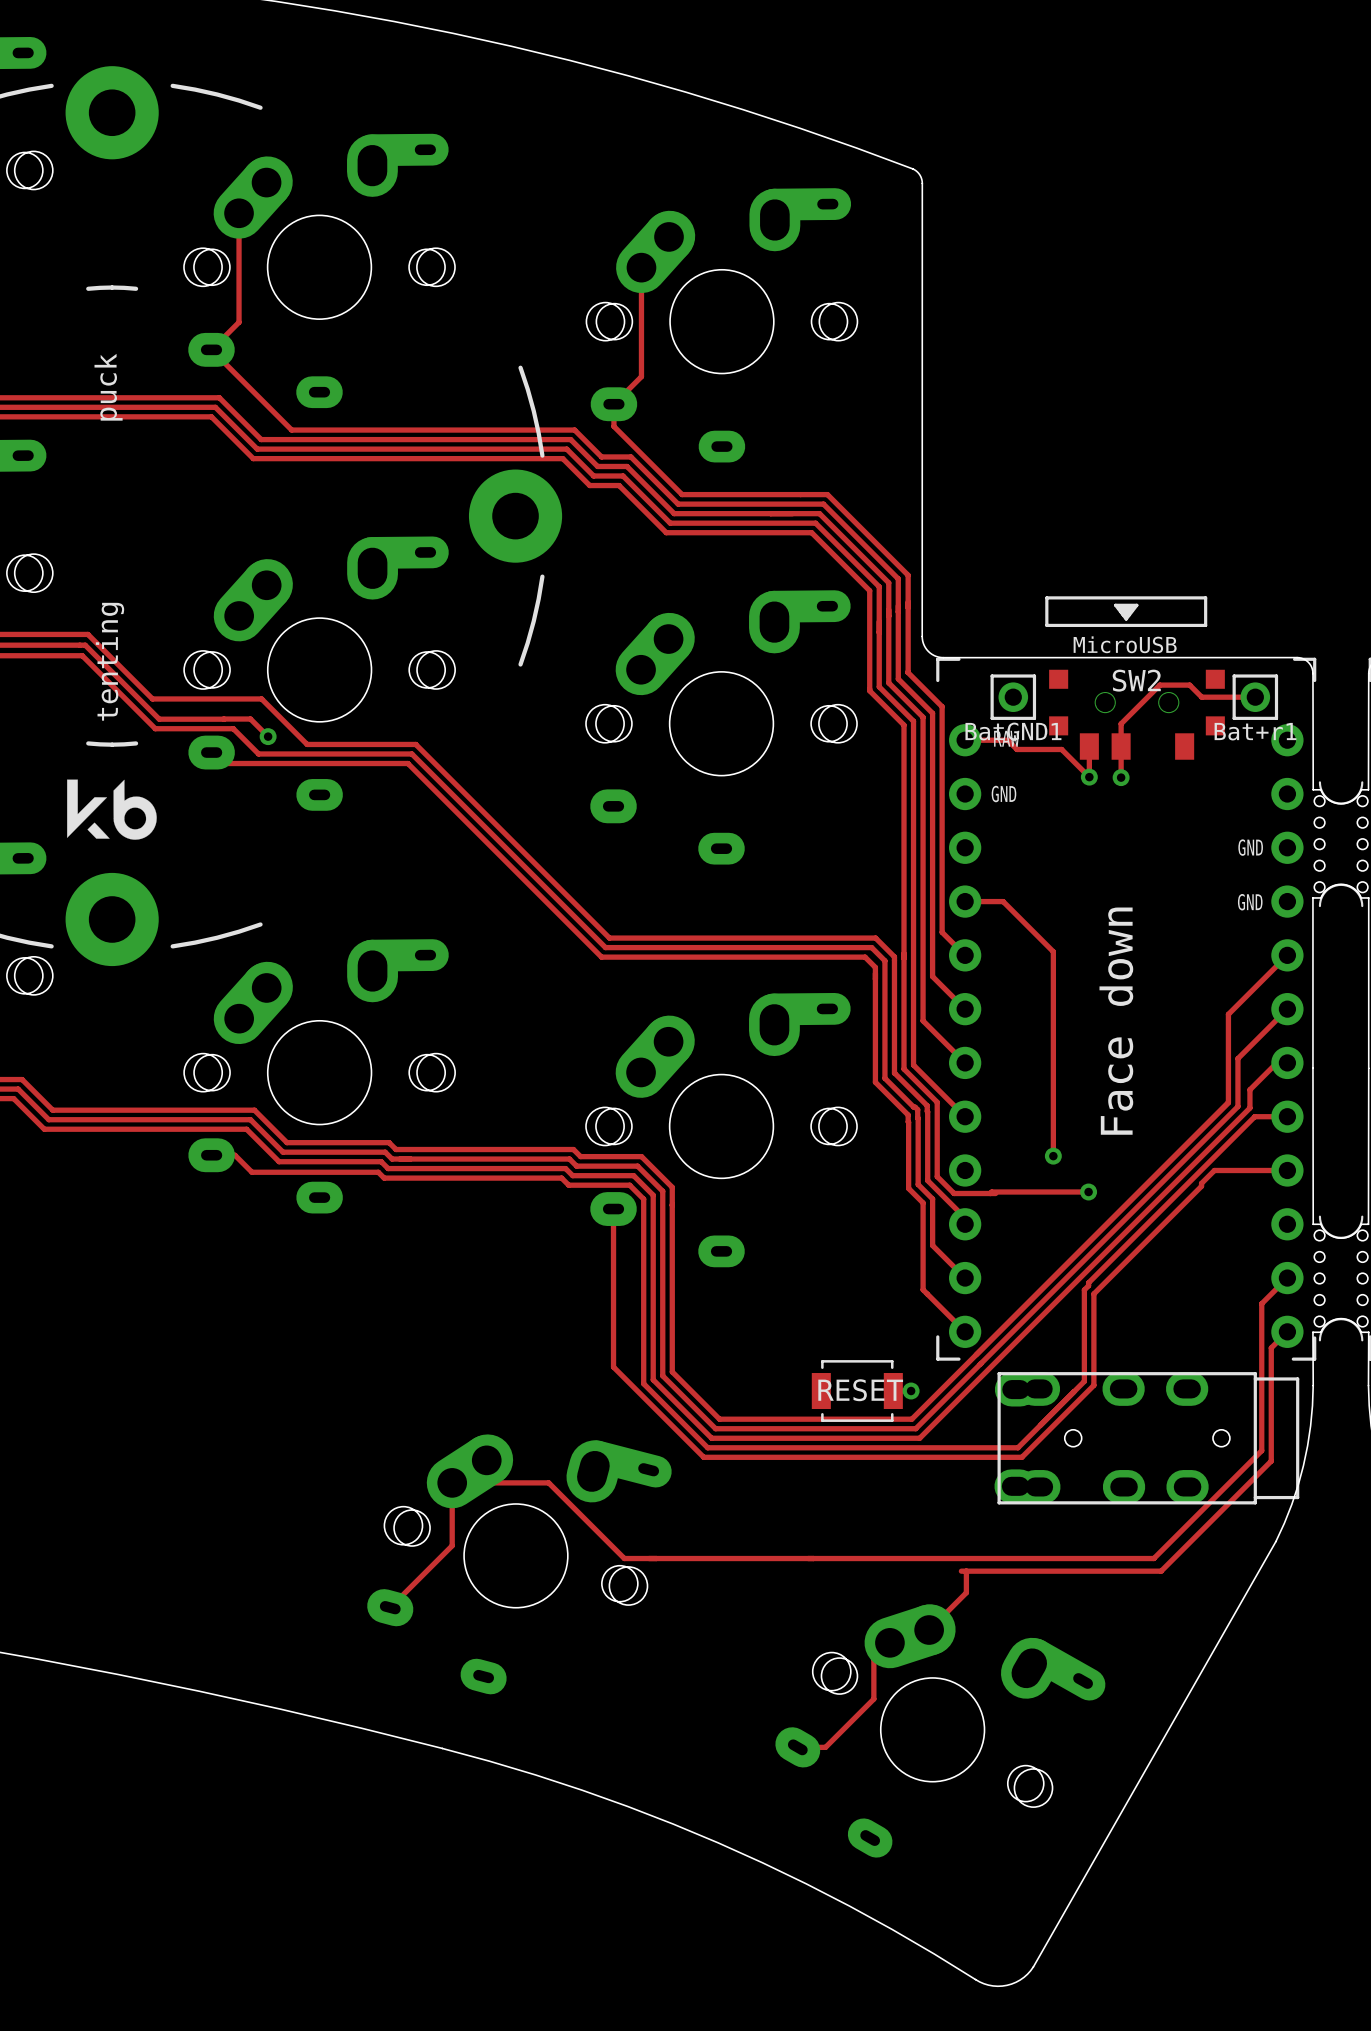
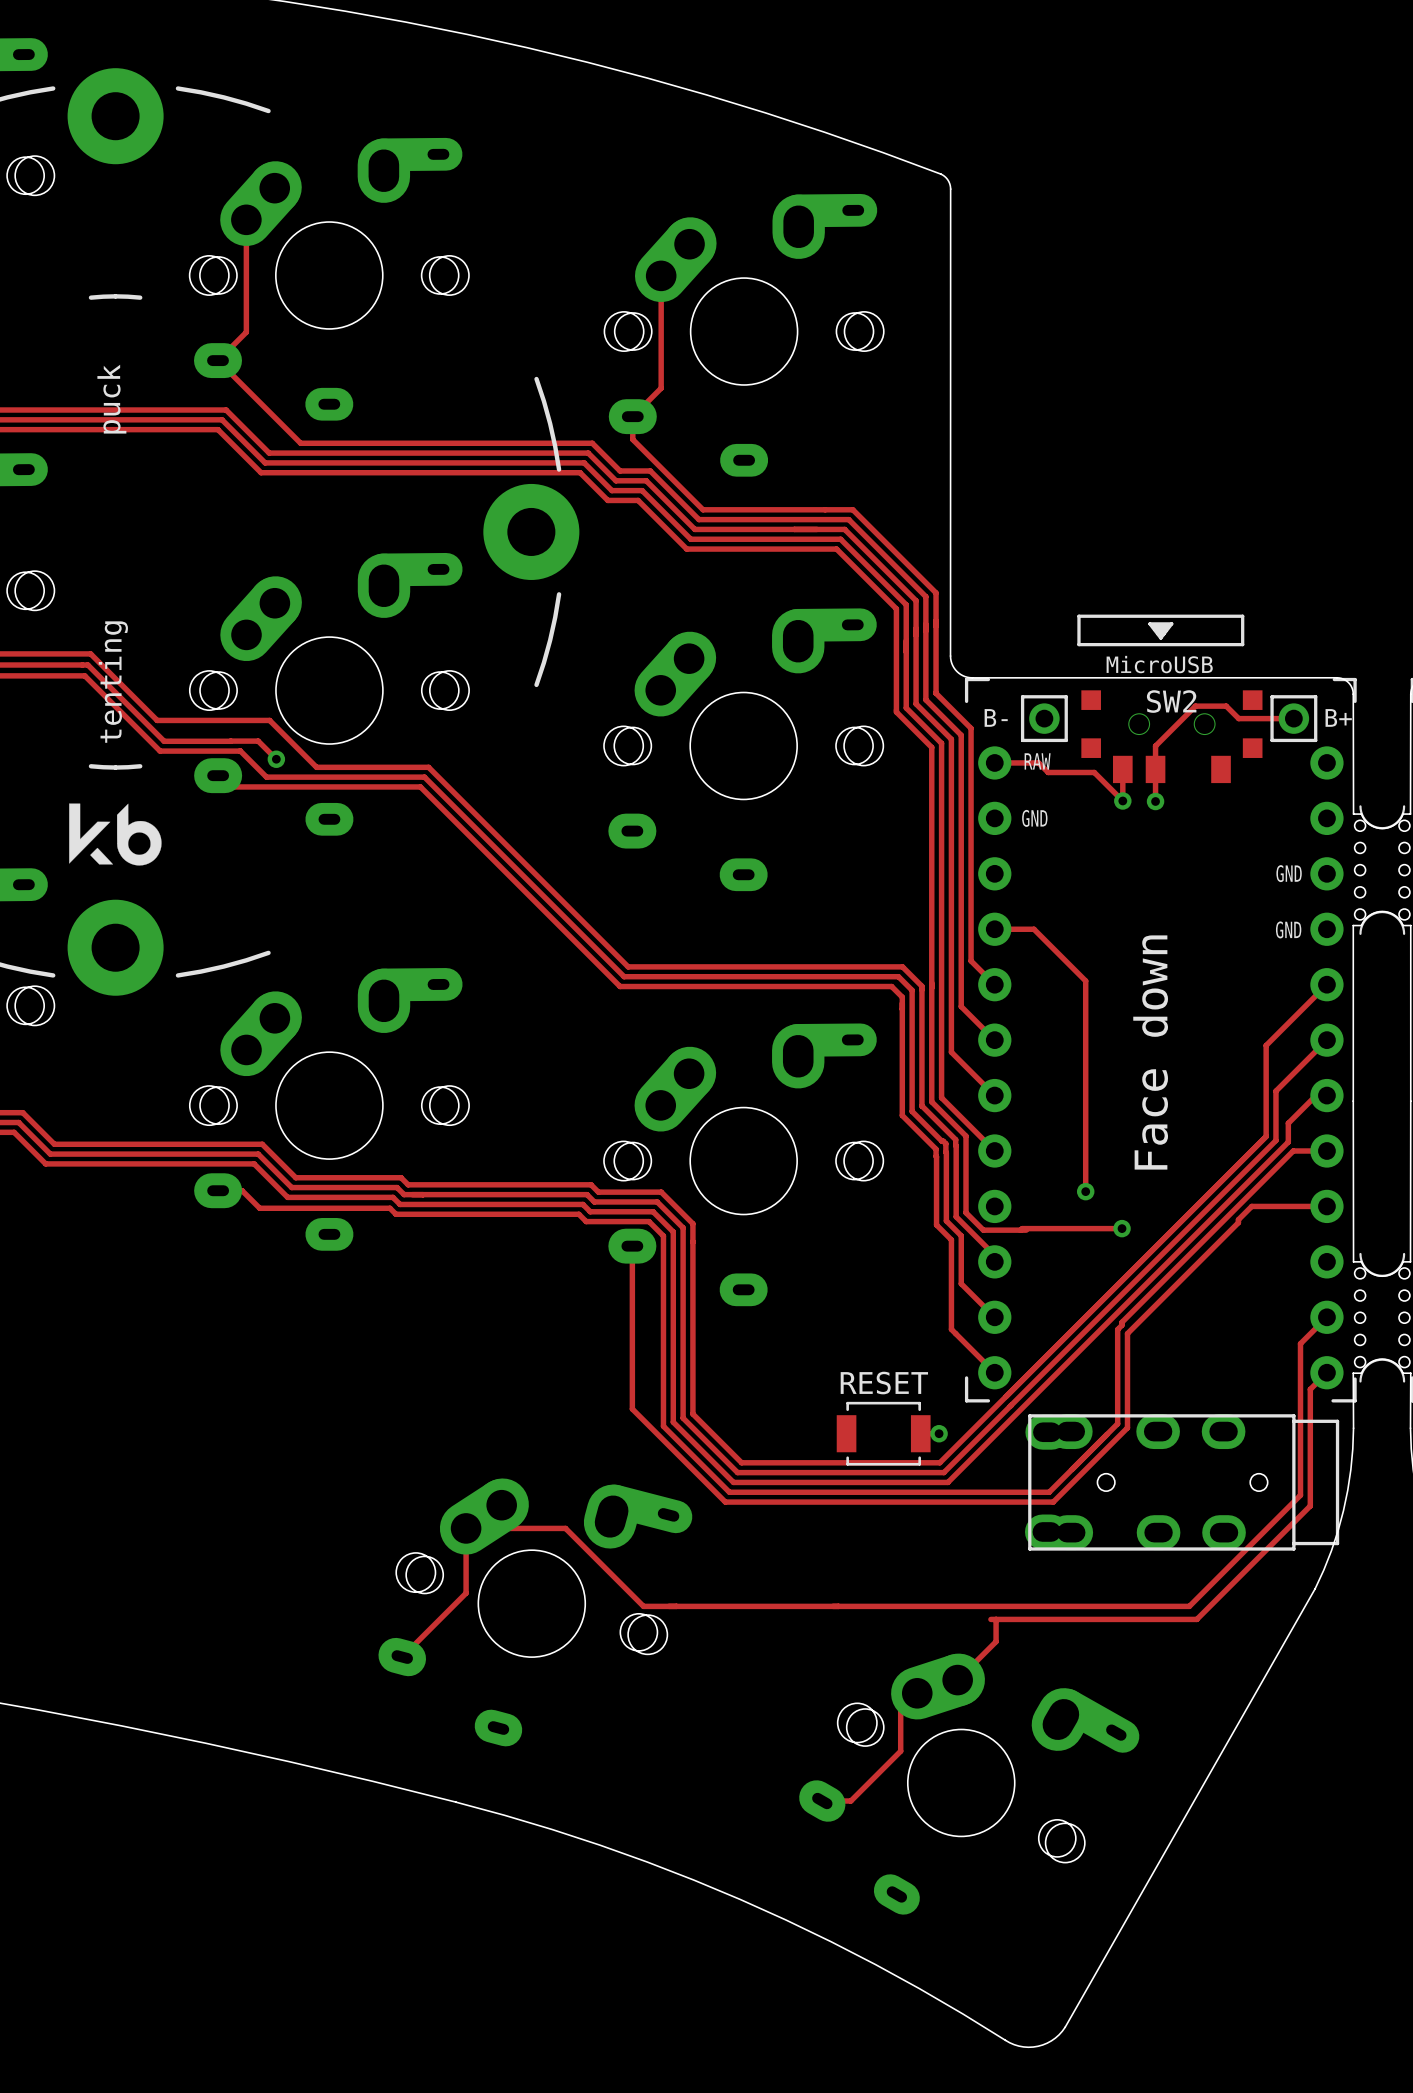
BatGND1 name: BatGND1 (1013, 731) -> B- (996, 717)
Bat+r1 name: Bat+r1 (1255, 731) -> B+ (1338, 717)
part position: (860, 1390) -> (884, 1383)

